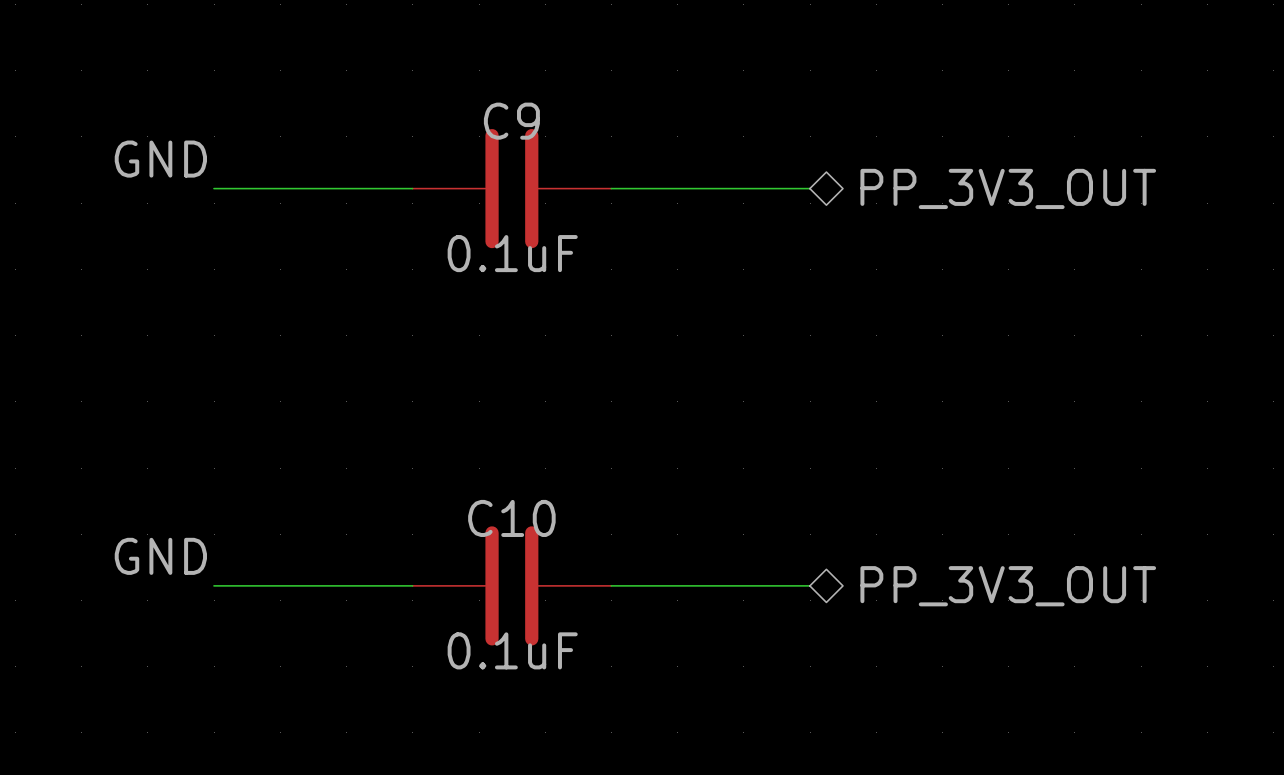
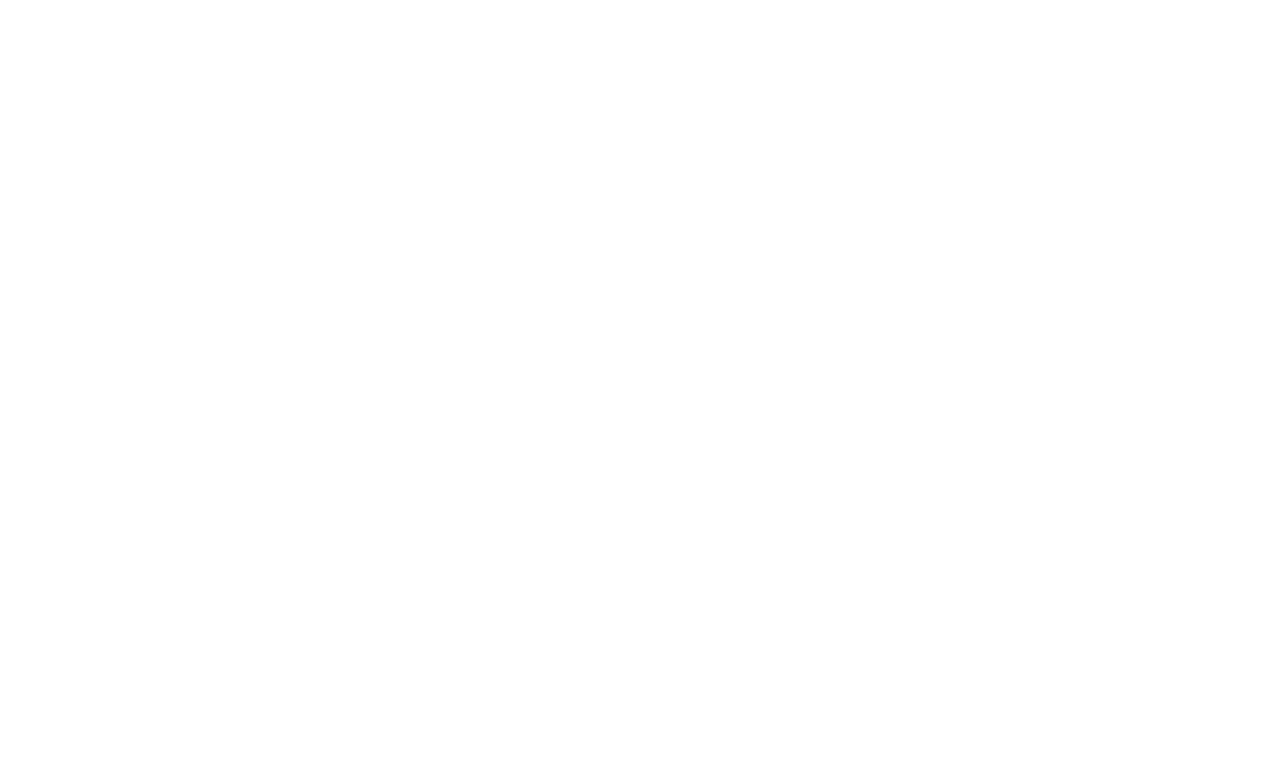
label: GND (160, 159) -> none
wire: (213, 188) (412, 188) -> none
C9: 0.1uF (511, 188) -> none
wire: (611, 188) (809, 188) -> none
hierarchical label: PP_3V3_OUT (1008, 188) -> none
label: GND (160, 556) -> none
wire: (213, 585) (412, 585) -> none
C10: 0.1uF (511, 585) -> none
wire: (611, 585) (809, 585) -> none
hierarchical label: PP_3V3_OUT (1008, 586) -> none

